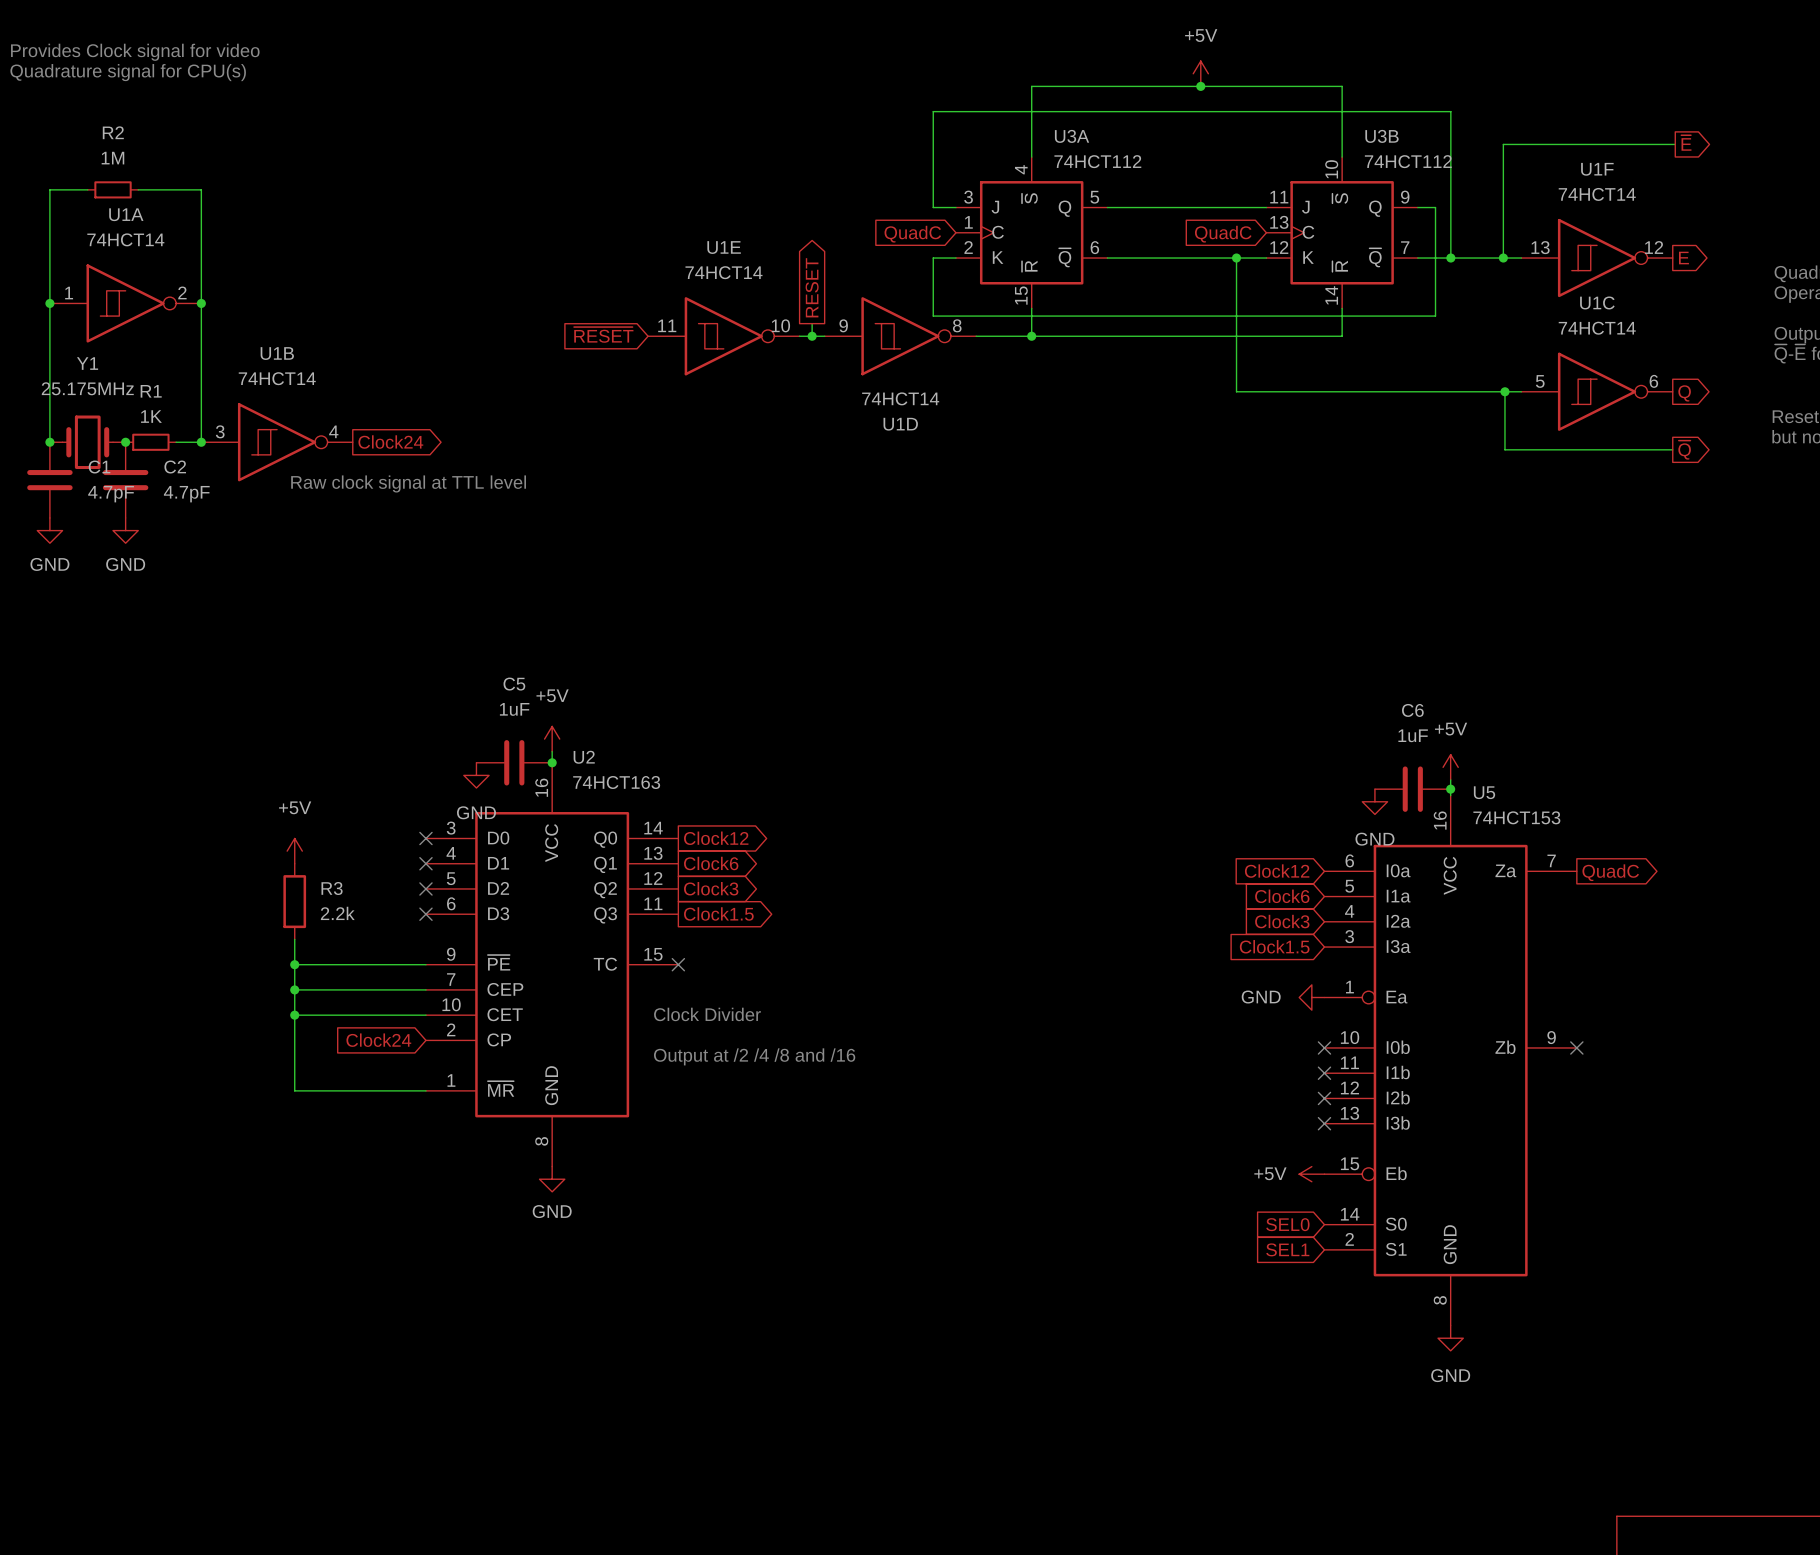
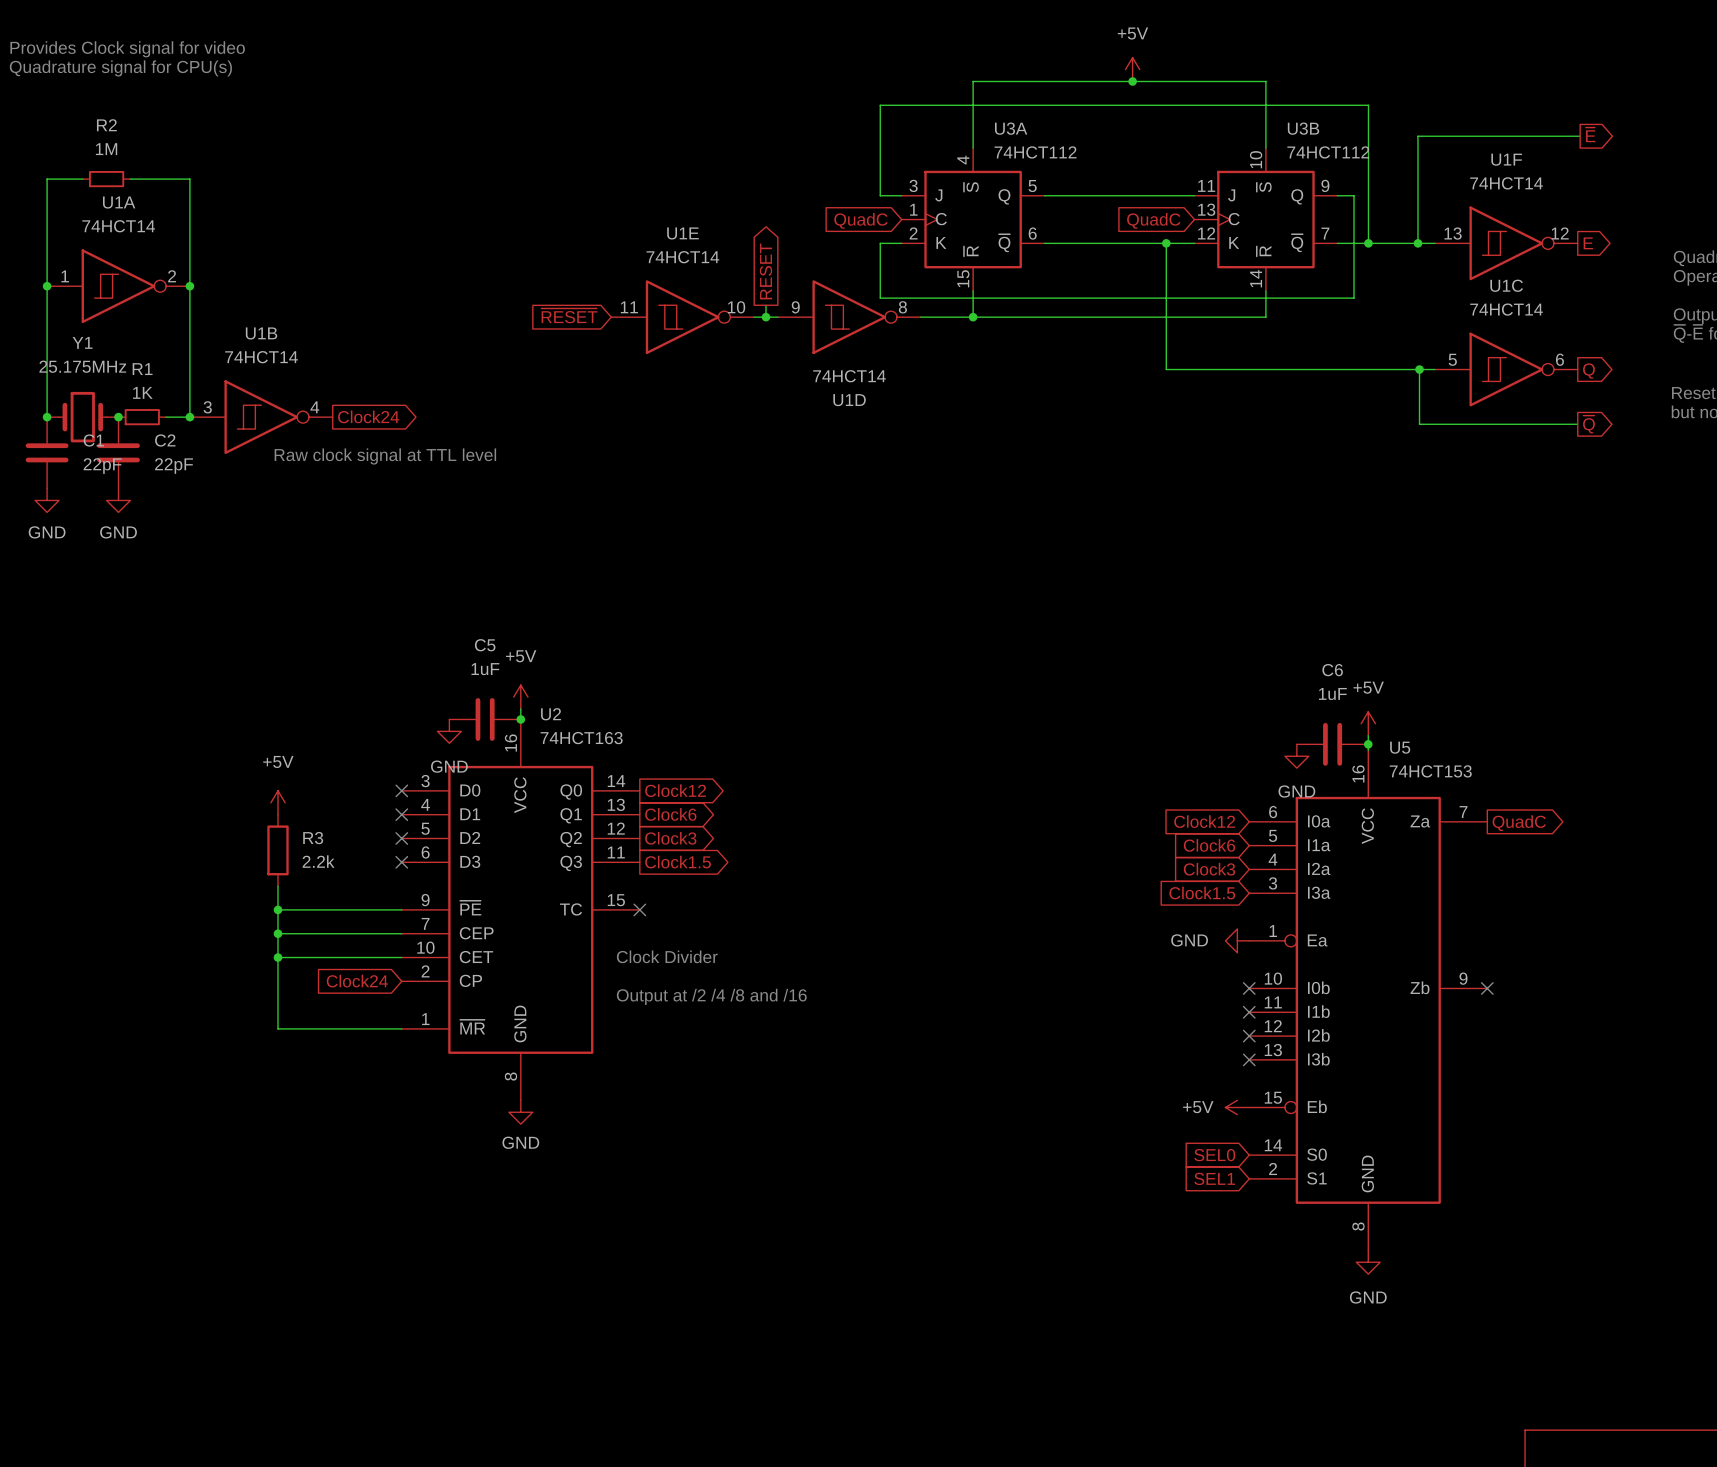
C1 value: 4.7pF (111, 494) -> 22pF (102, 466)
C2 value: 4.7pF (186, 494) -> 22pF (174, 466)

